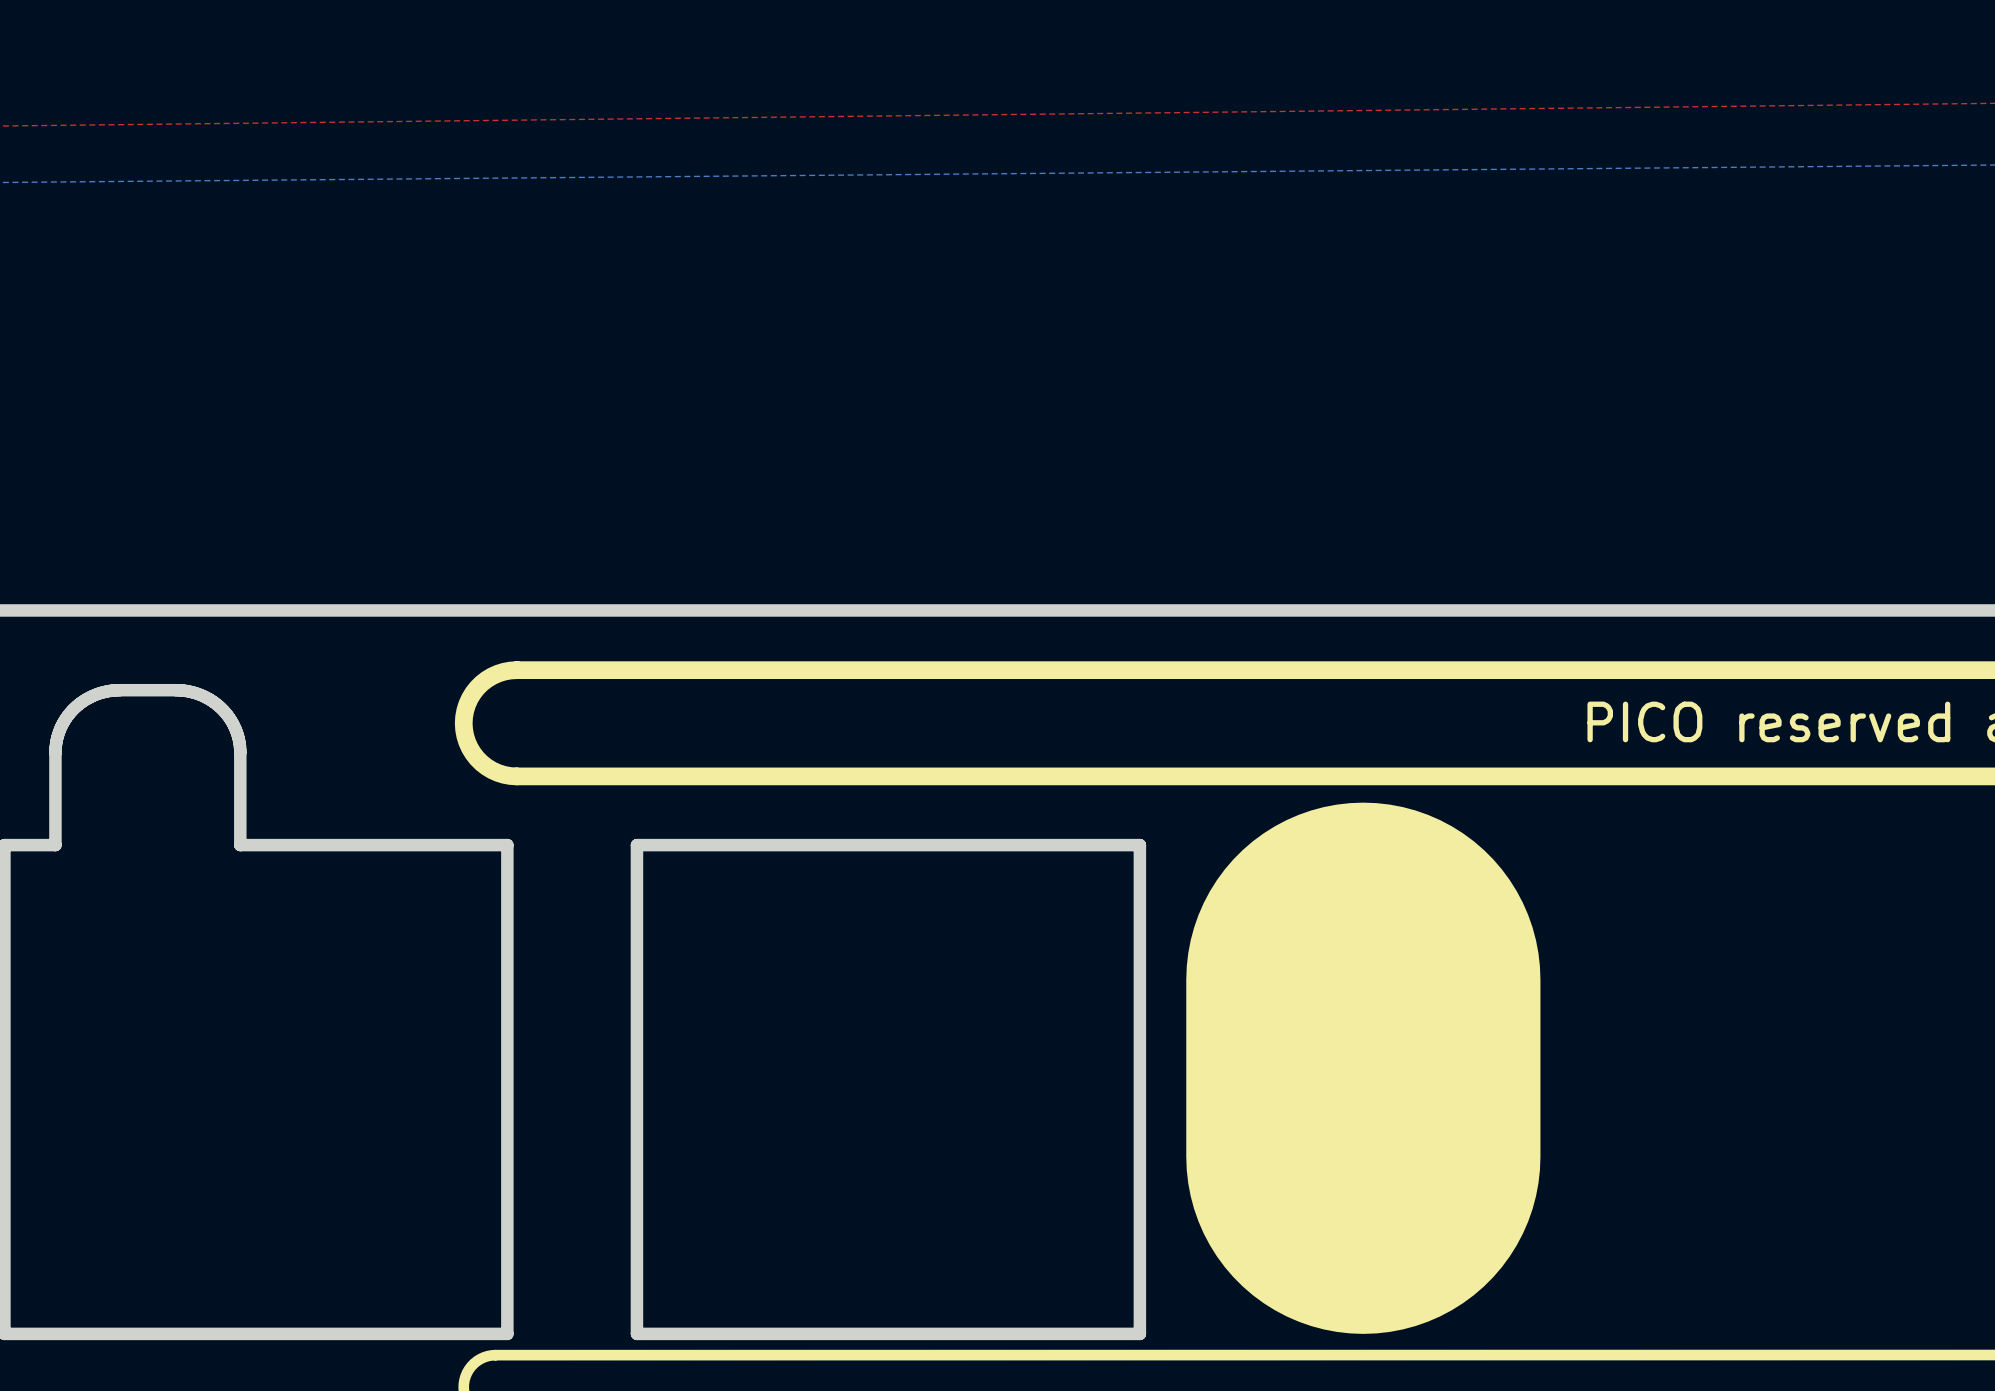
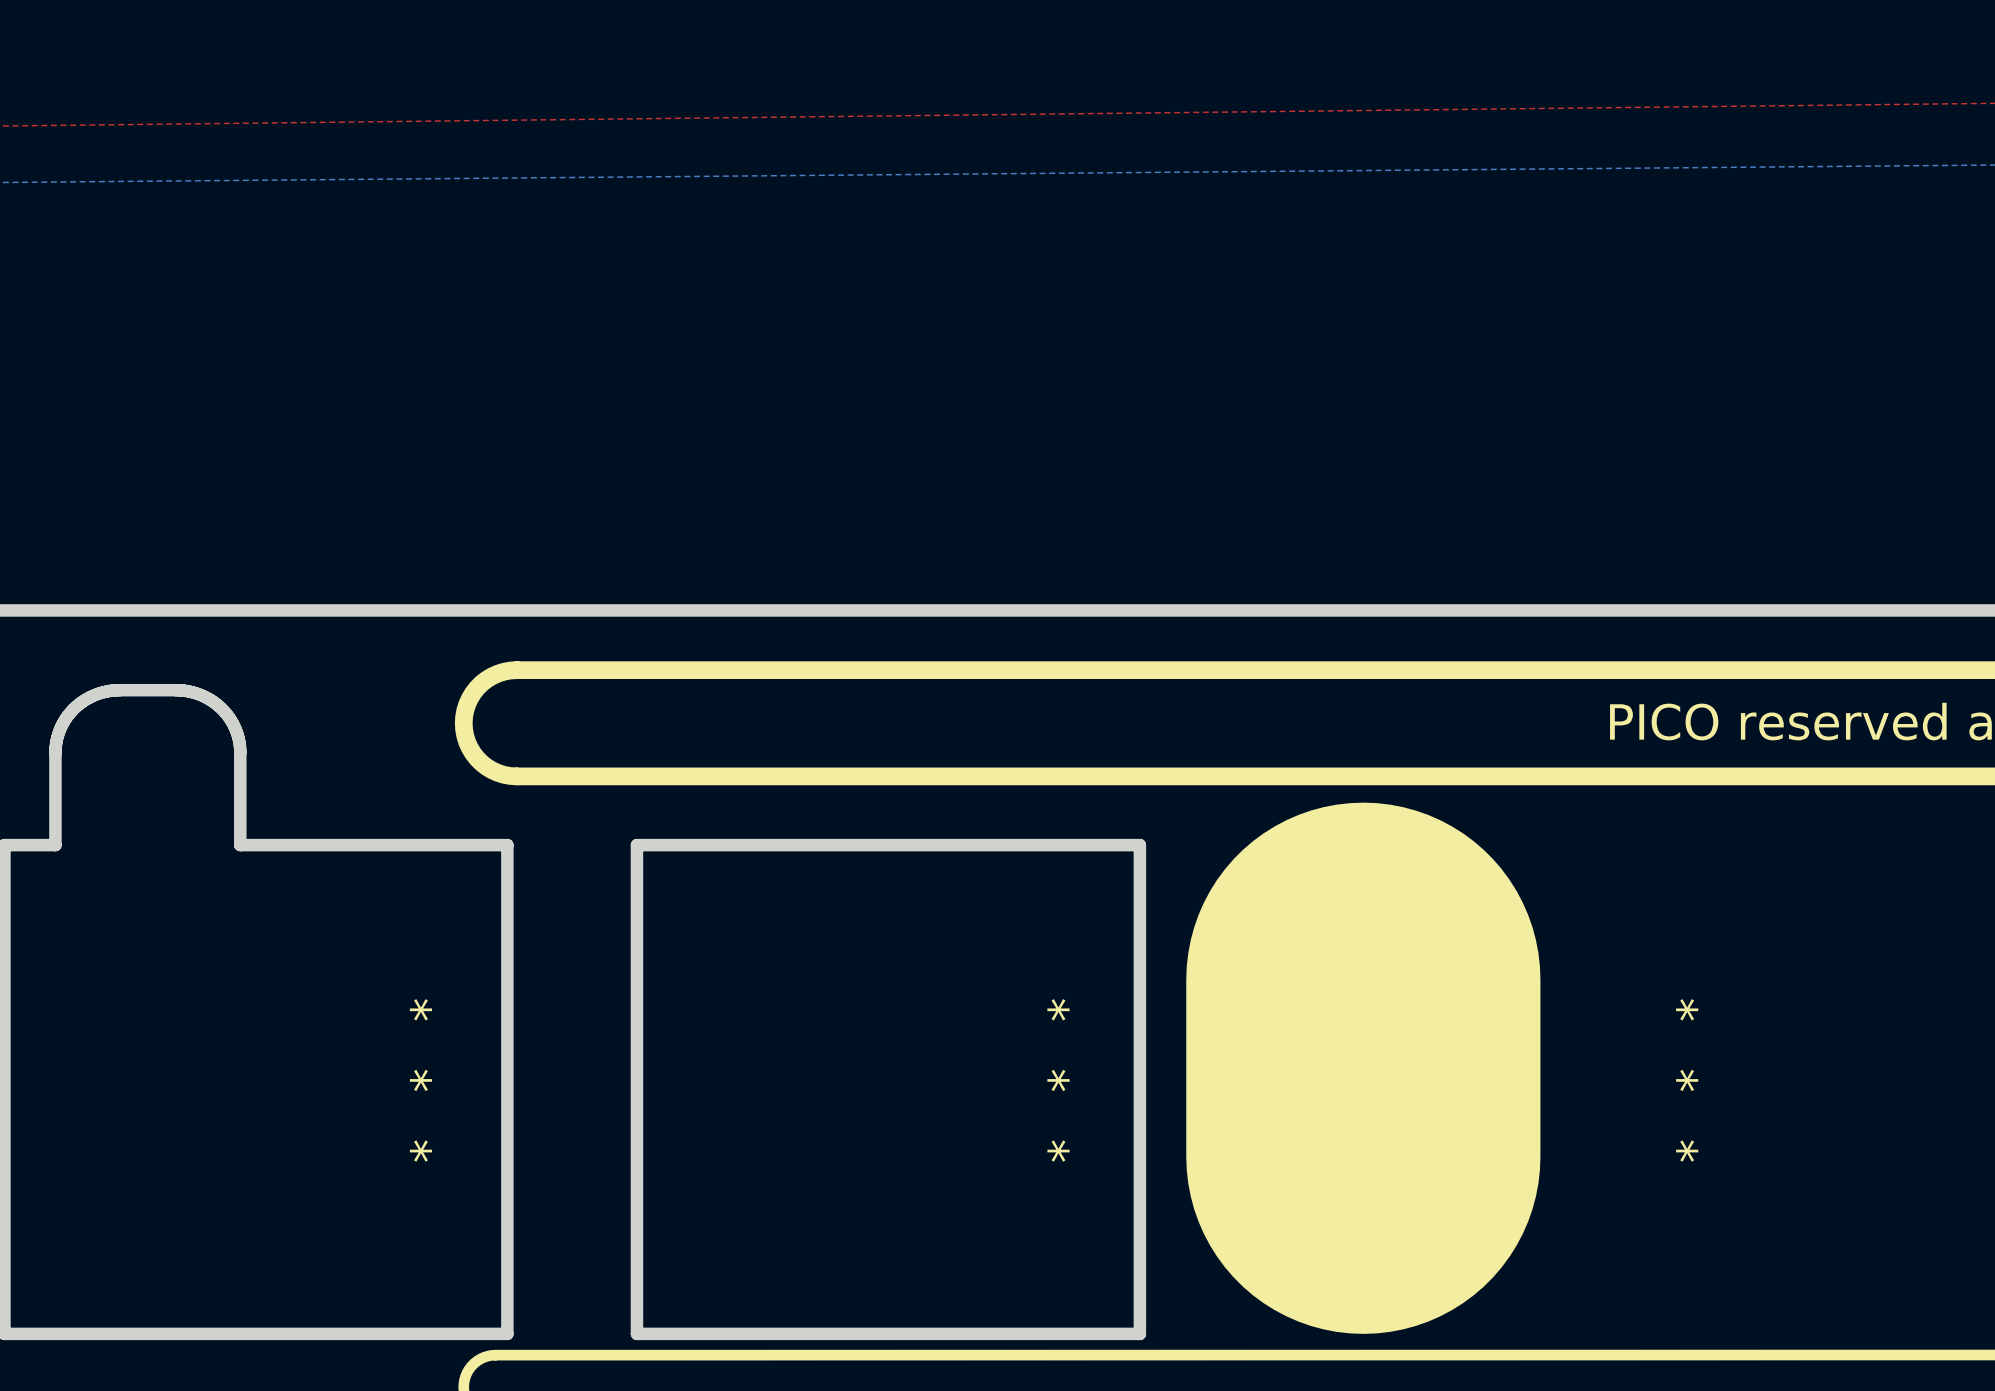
text: none -> * * * (420, 1080)
text: none -> * * * (1058, 1080)
text: none -> * * * (1687, 1080)

